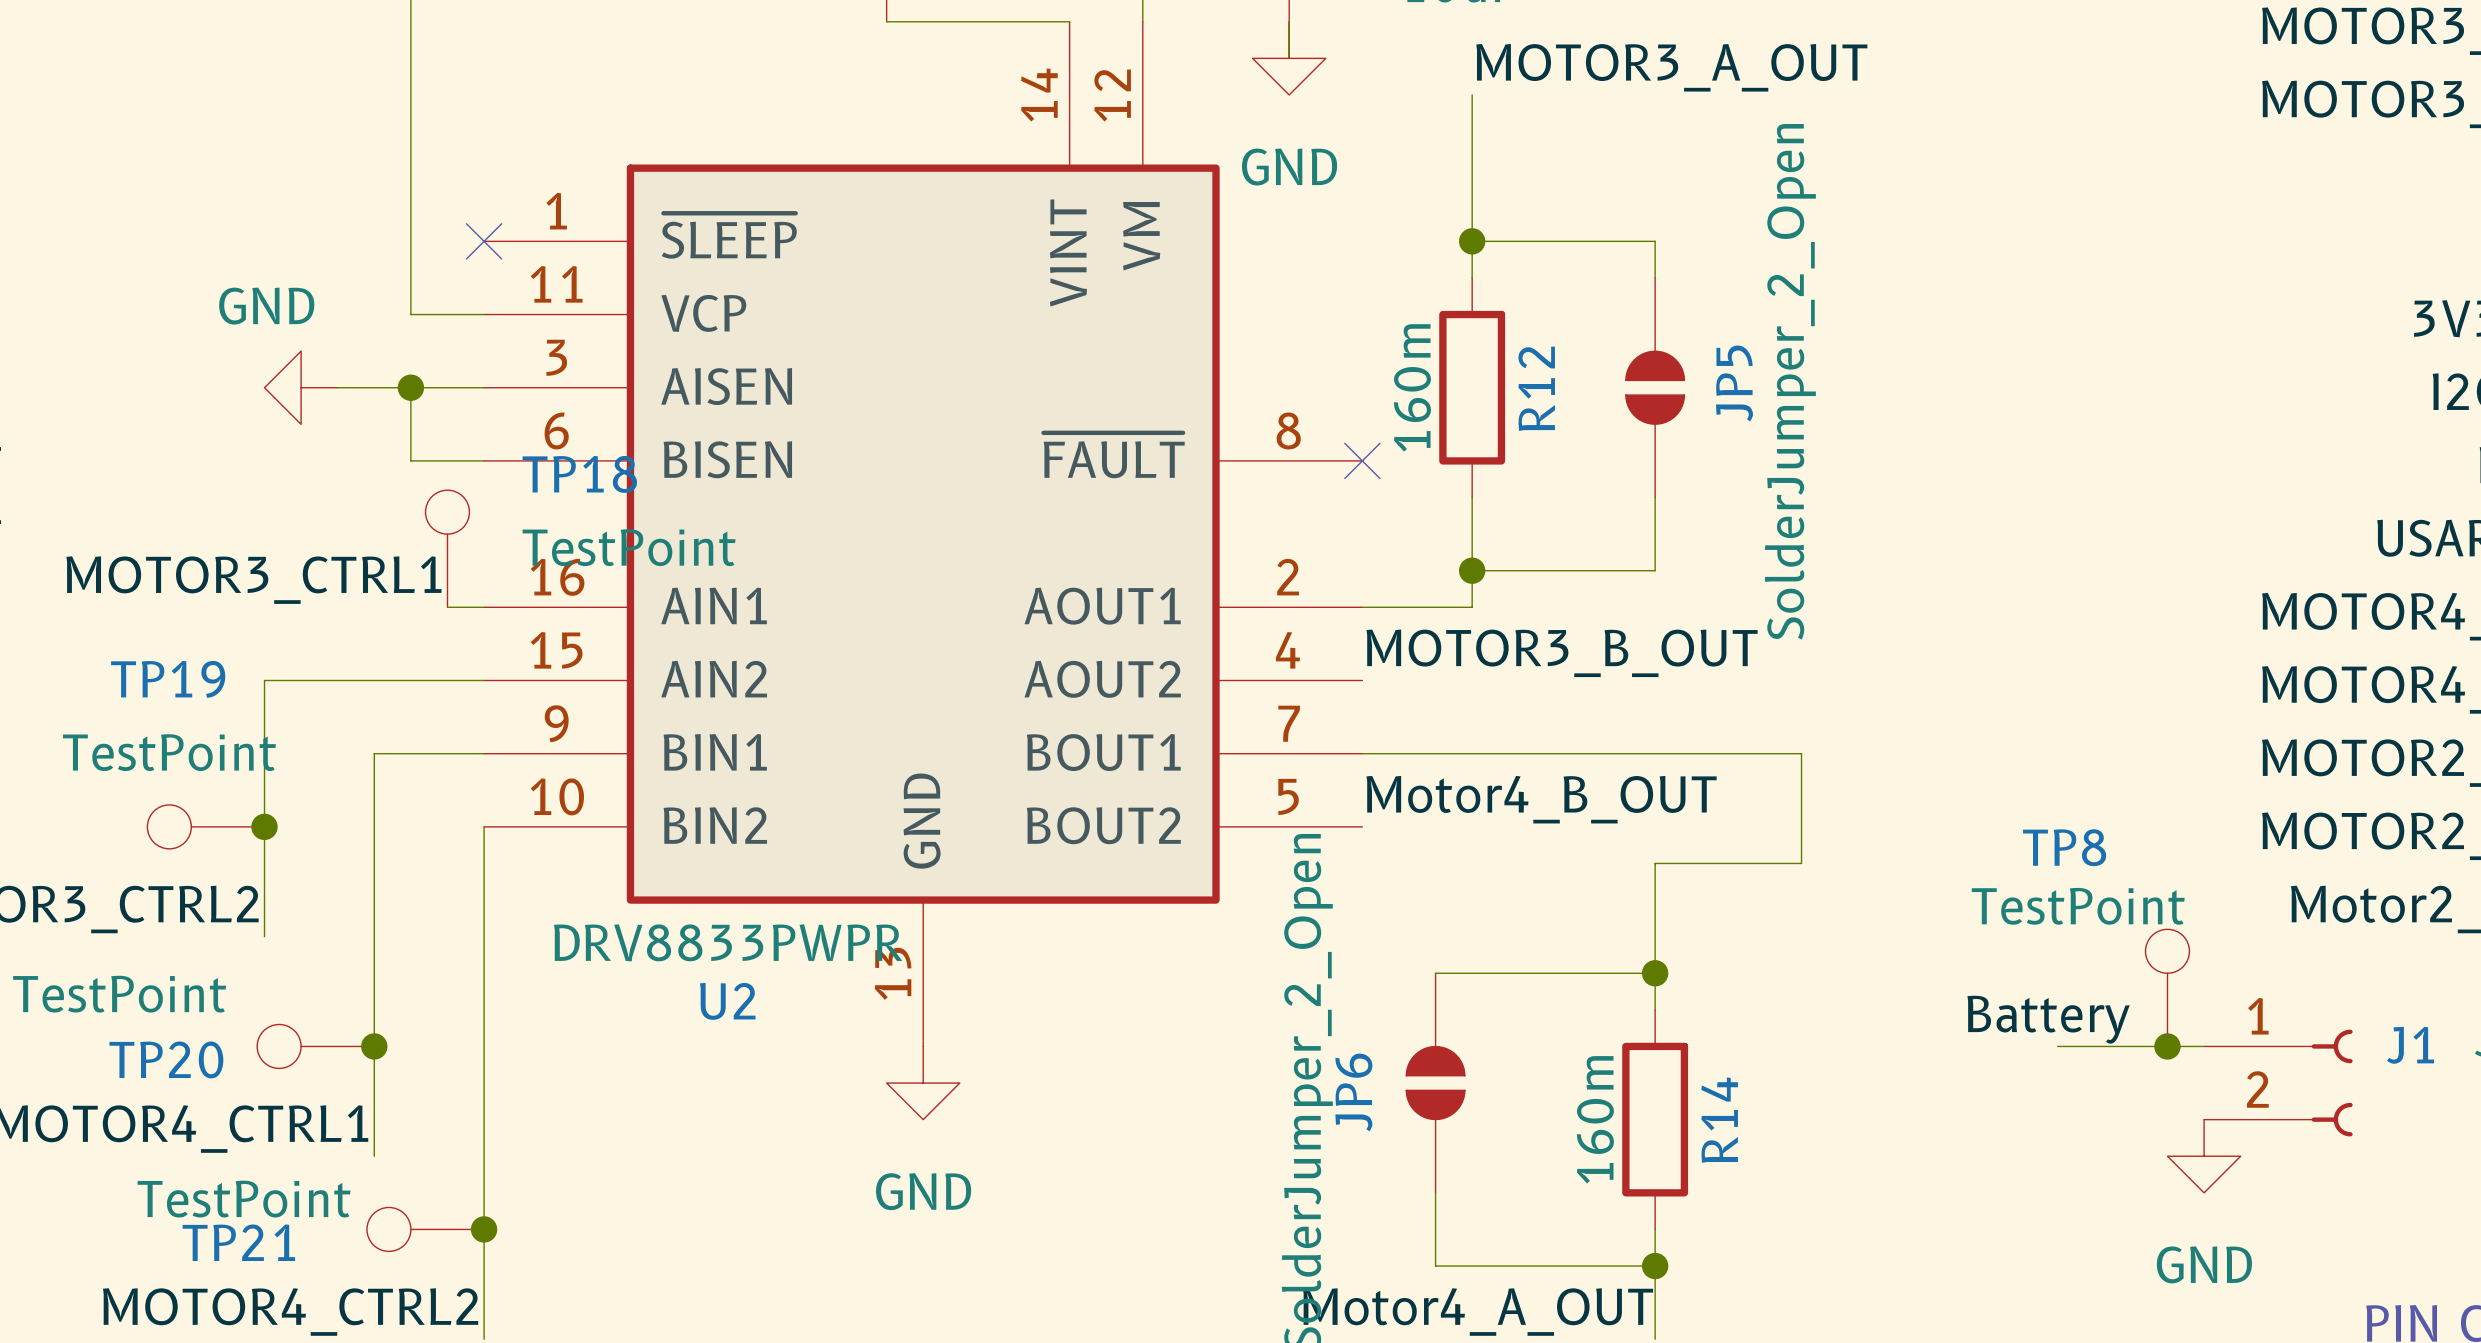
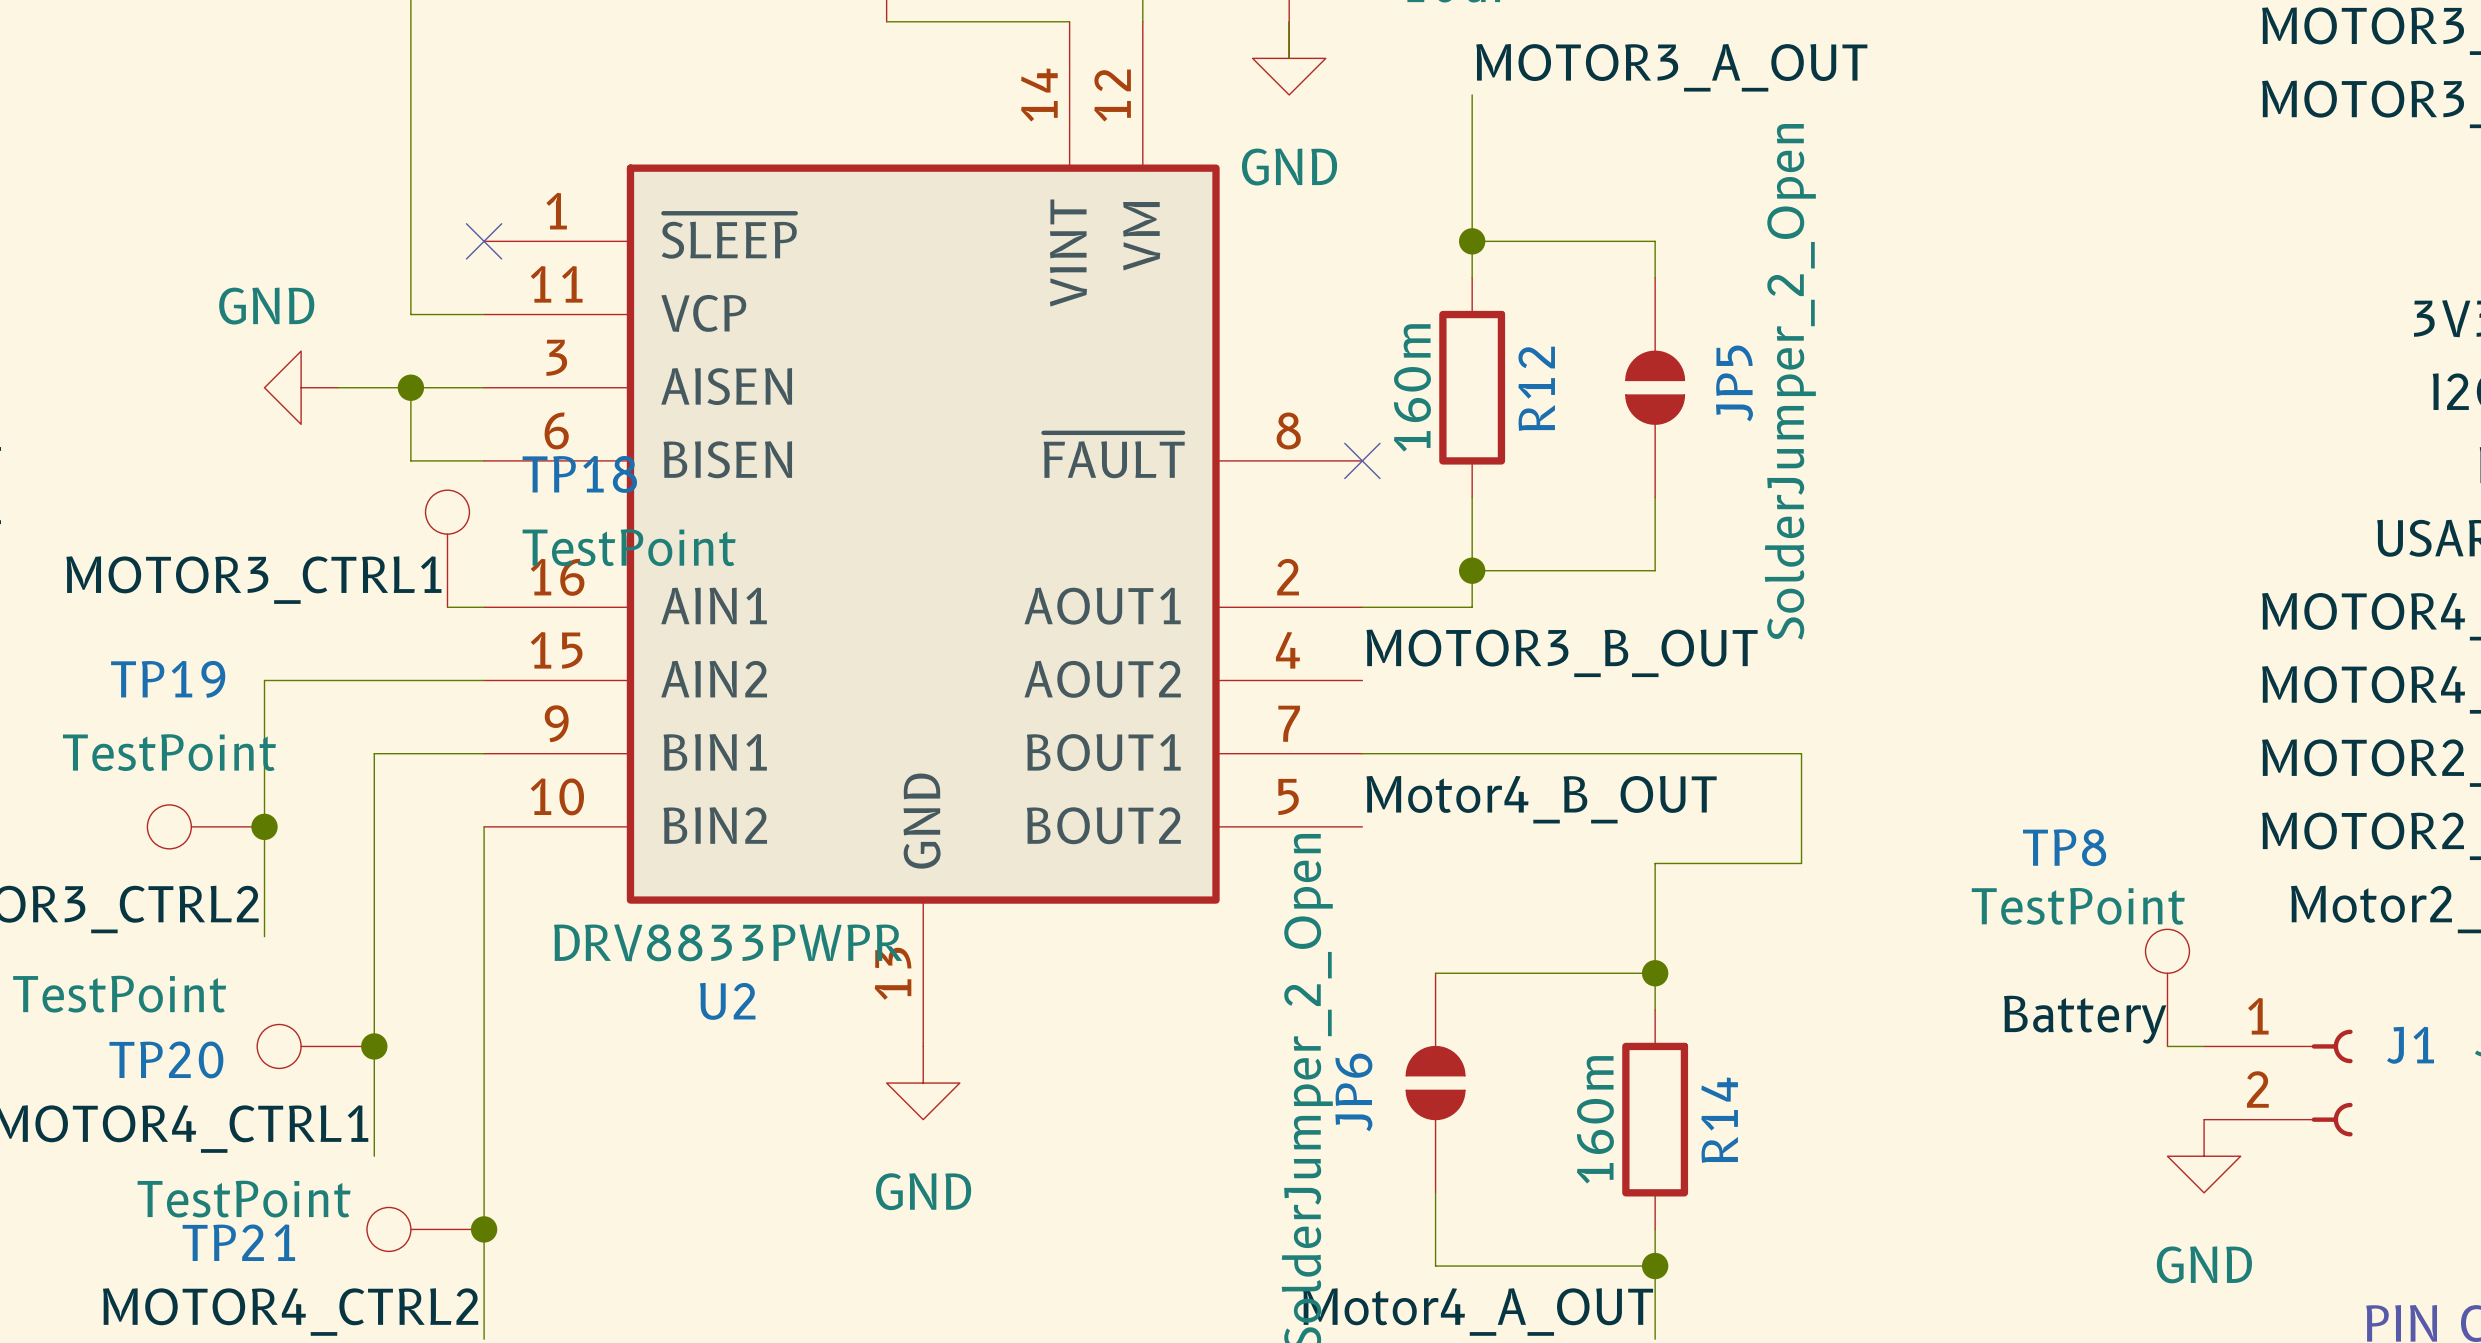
label position: Battery (2048, 1019) -> Battery (2085, 1019)
wire: (2057, 1046) (2167, 1046) -> none
junction: (2167, 1046) -> none

